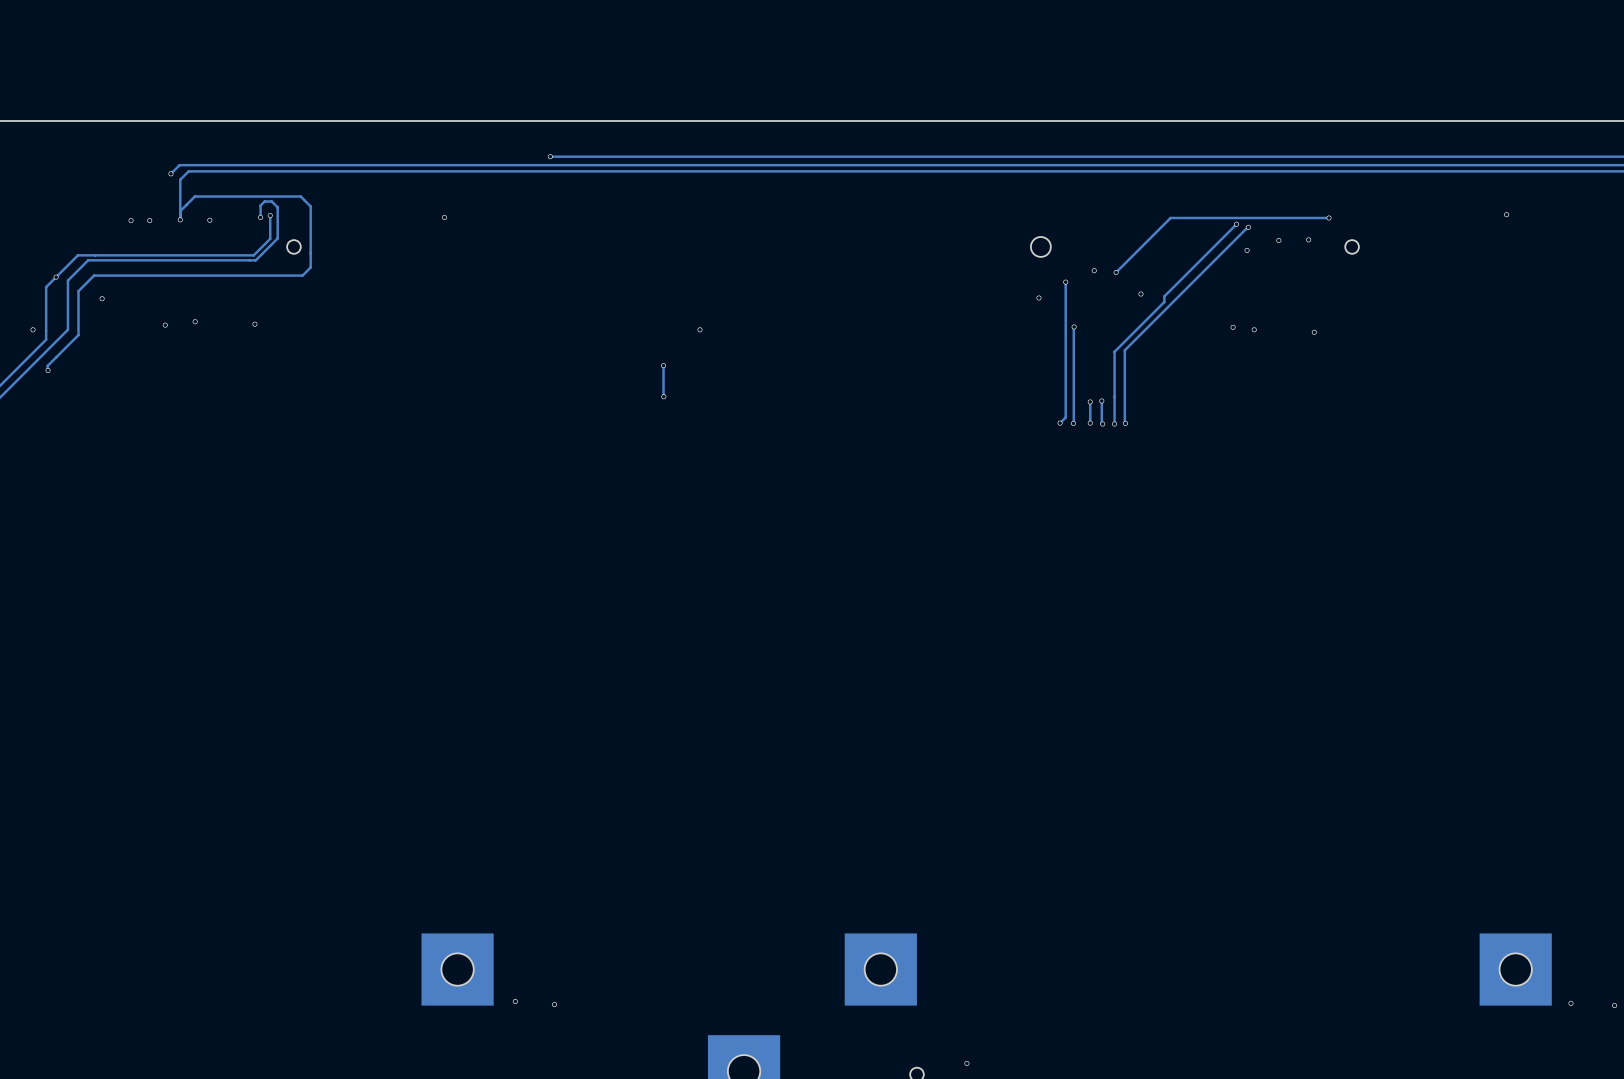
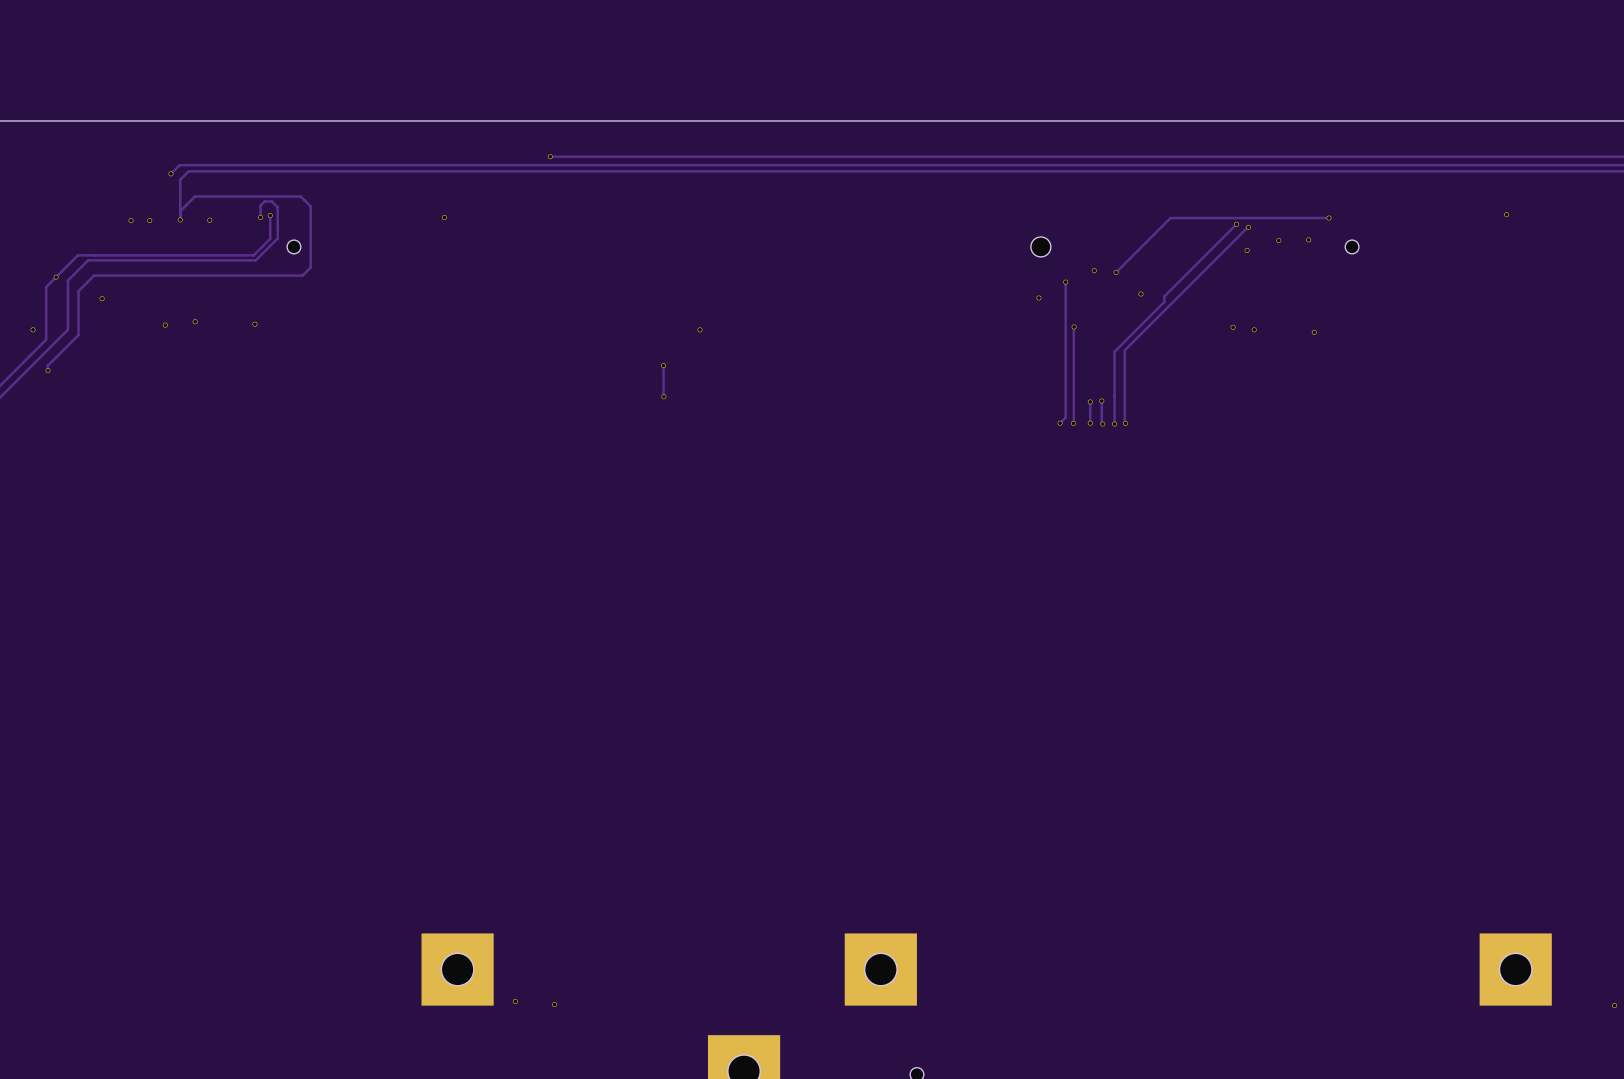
via: (1570, 1003) -> none
via: (966, 1063) -> none

